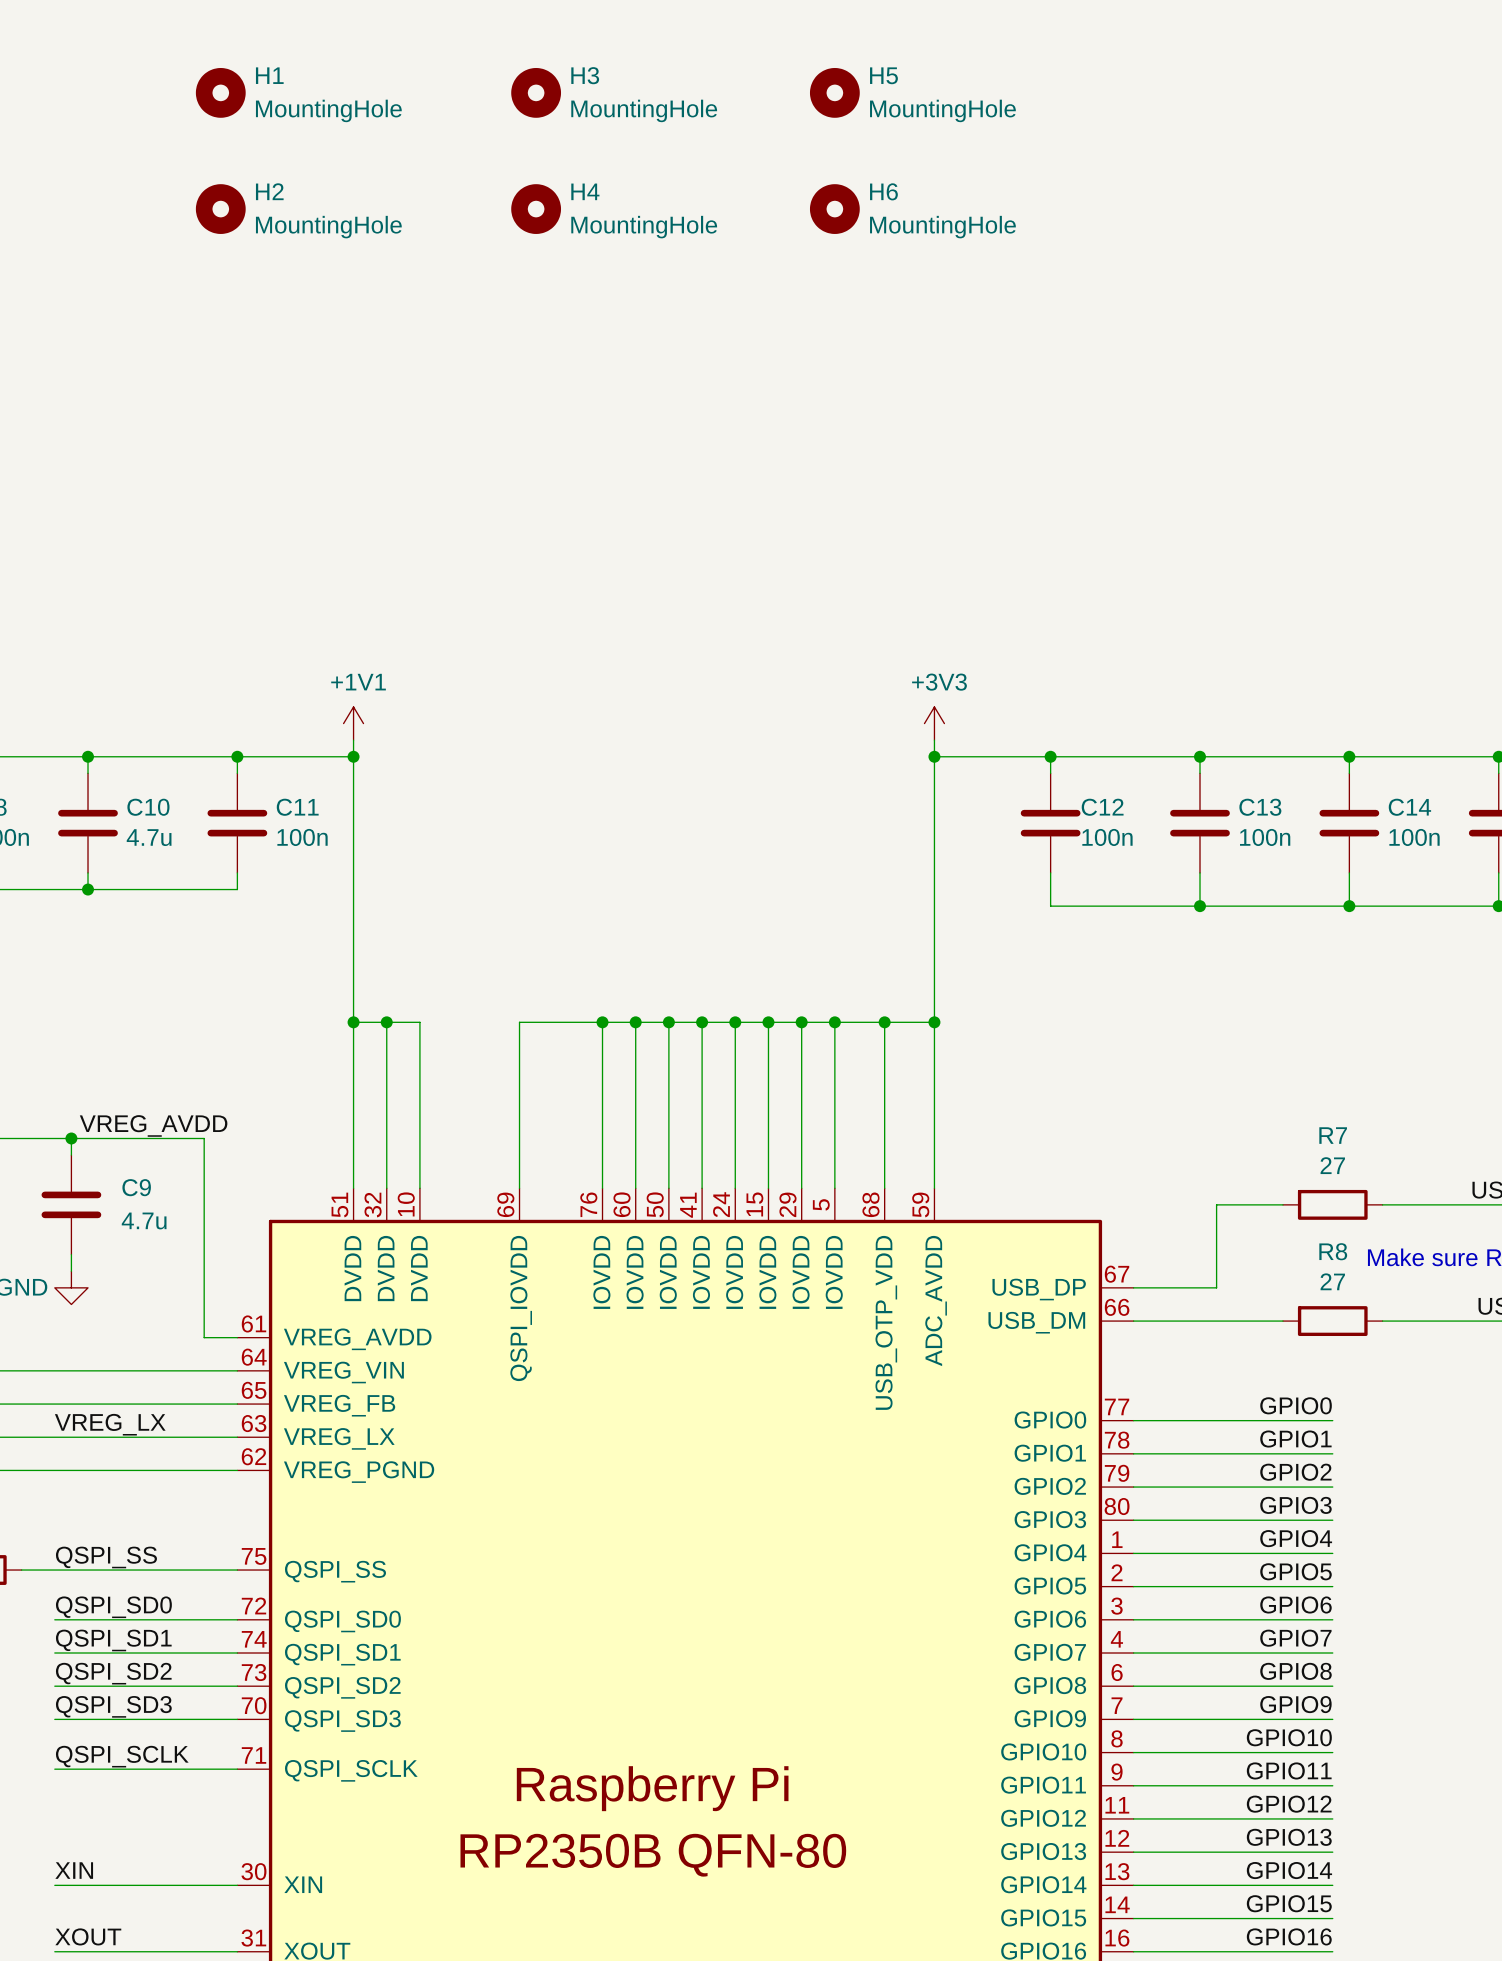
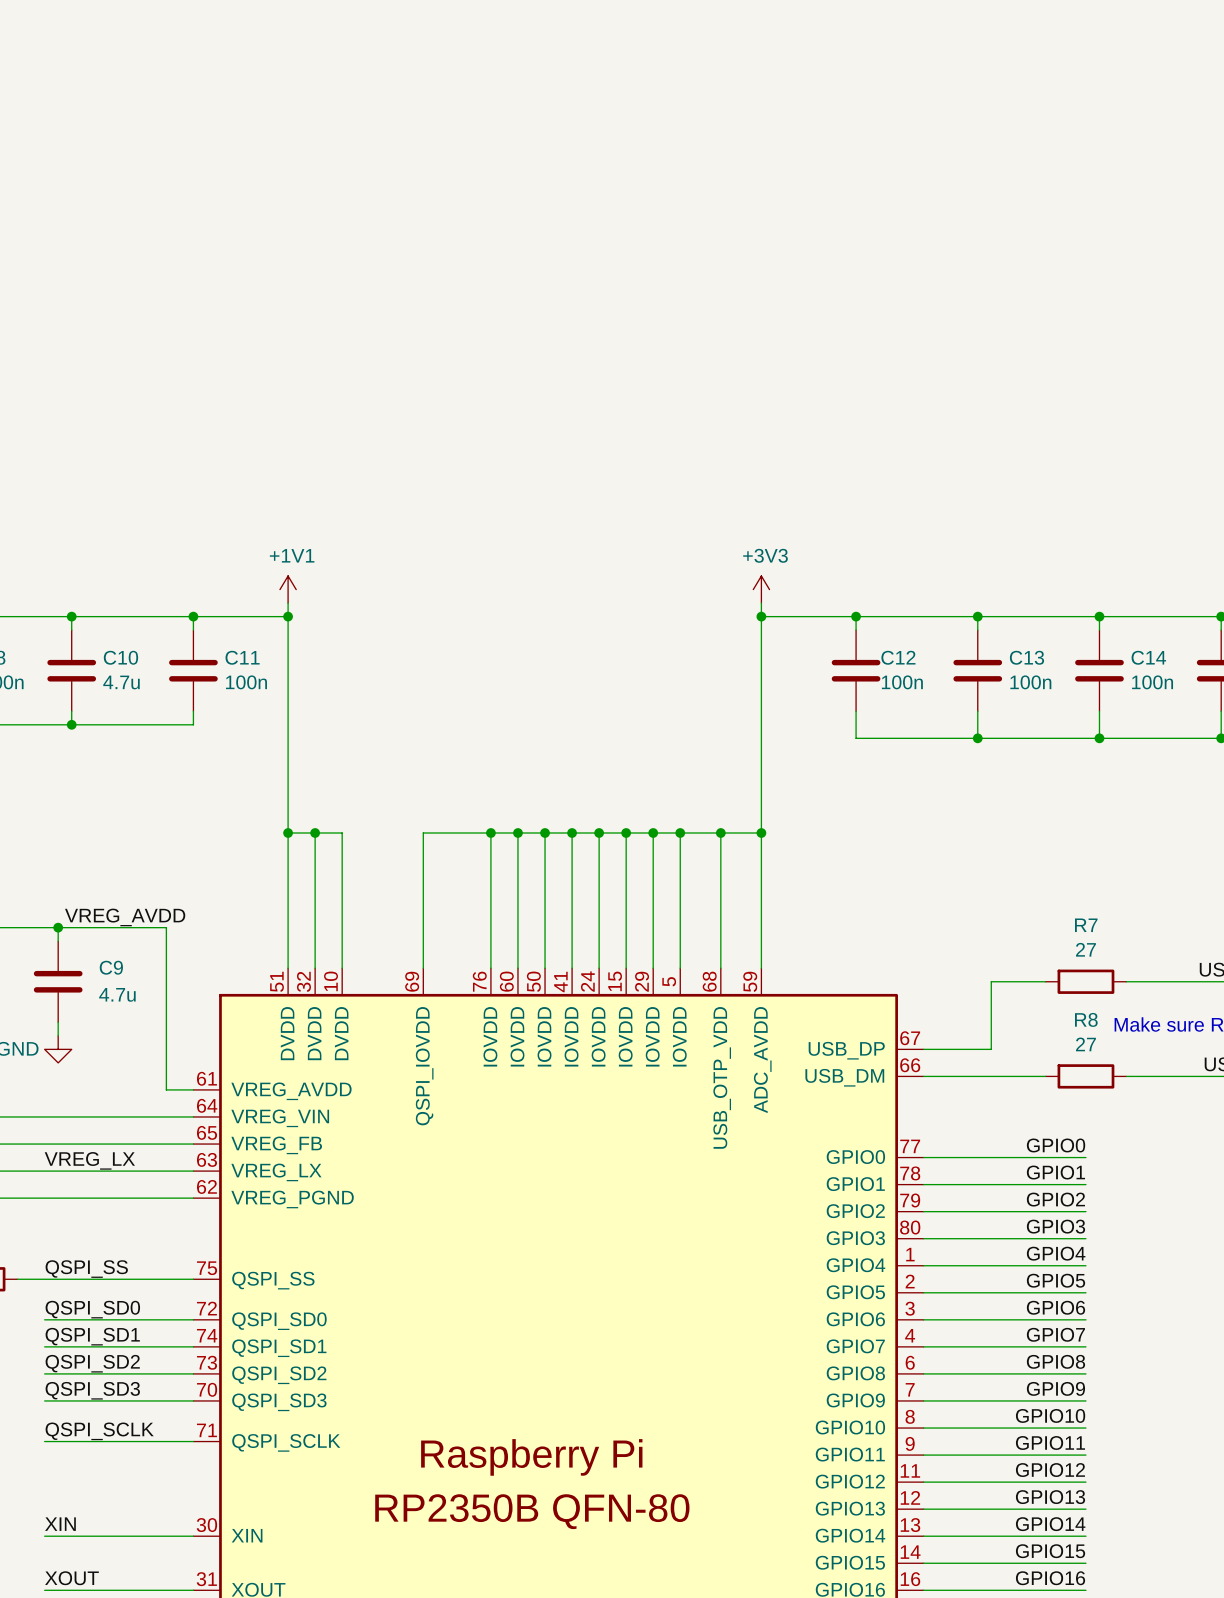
H1: MountingHole (220, 92) -> none
H3: MountingHole (536, 92) -> none
H5: MountingHole (834, 92) -> none
H2: MountingHole (220, 209) -> none
H4: MountingHole (536, 209) -> none
H6: MountingHole (834, 209) -> none

